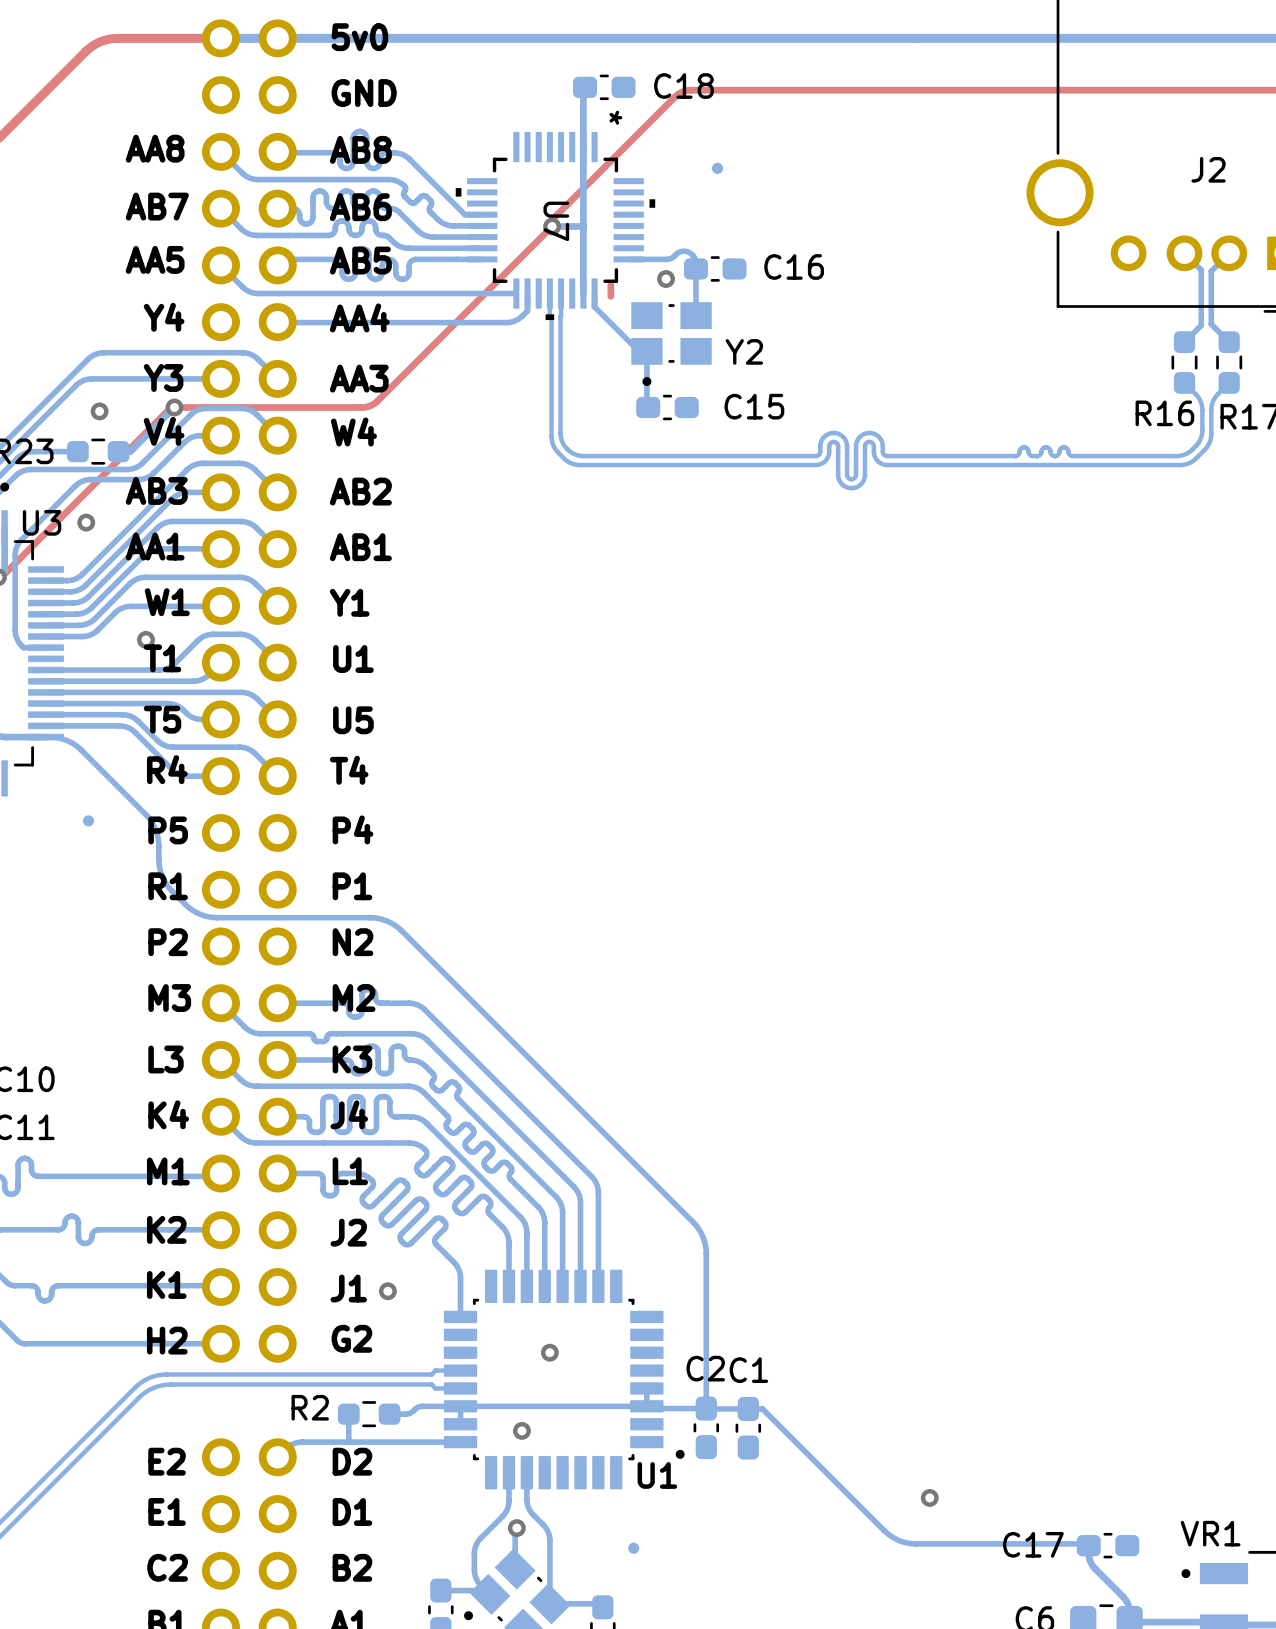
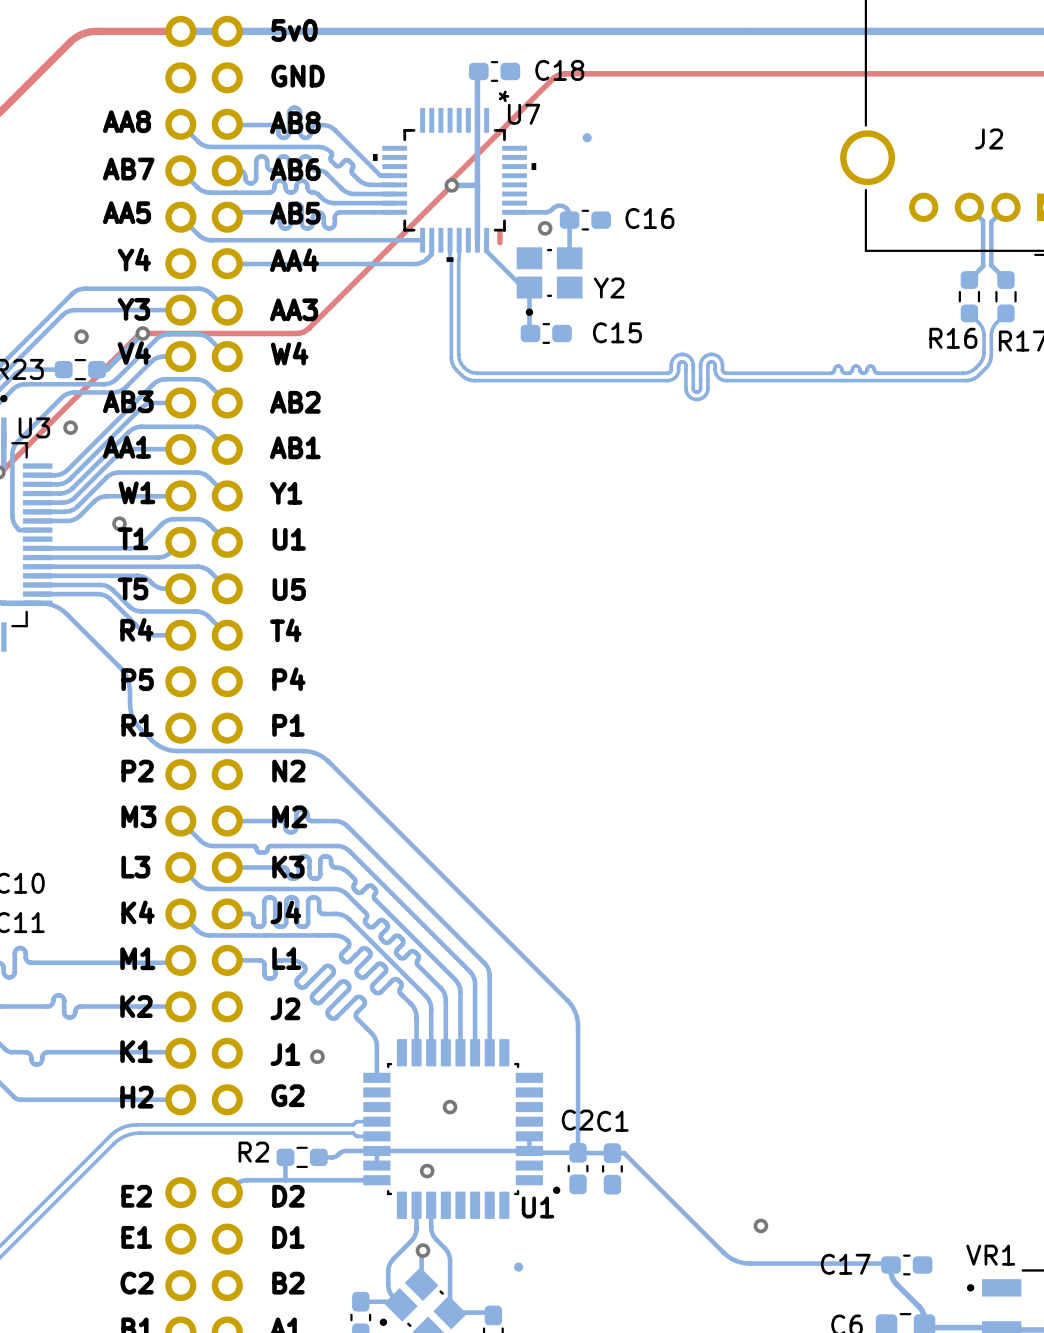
U7 name rotation: 0° (556, 221) -> 90° counterclockwise (524, 114)
U7 name position: U7 (556, 221) -> U7 (524, 114)
part: (88, 820) -> none

